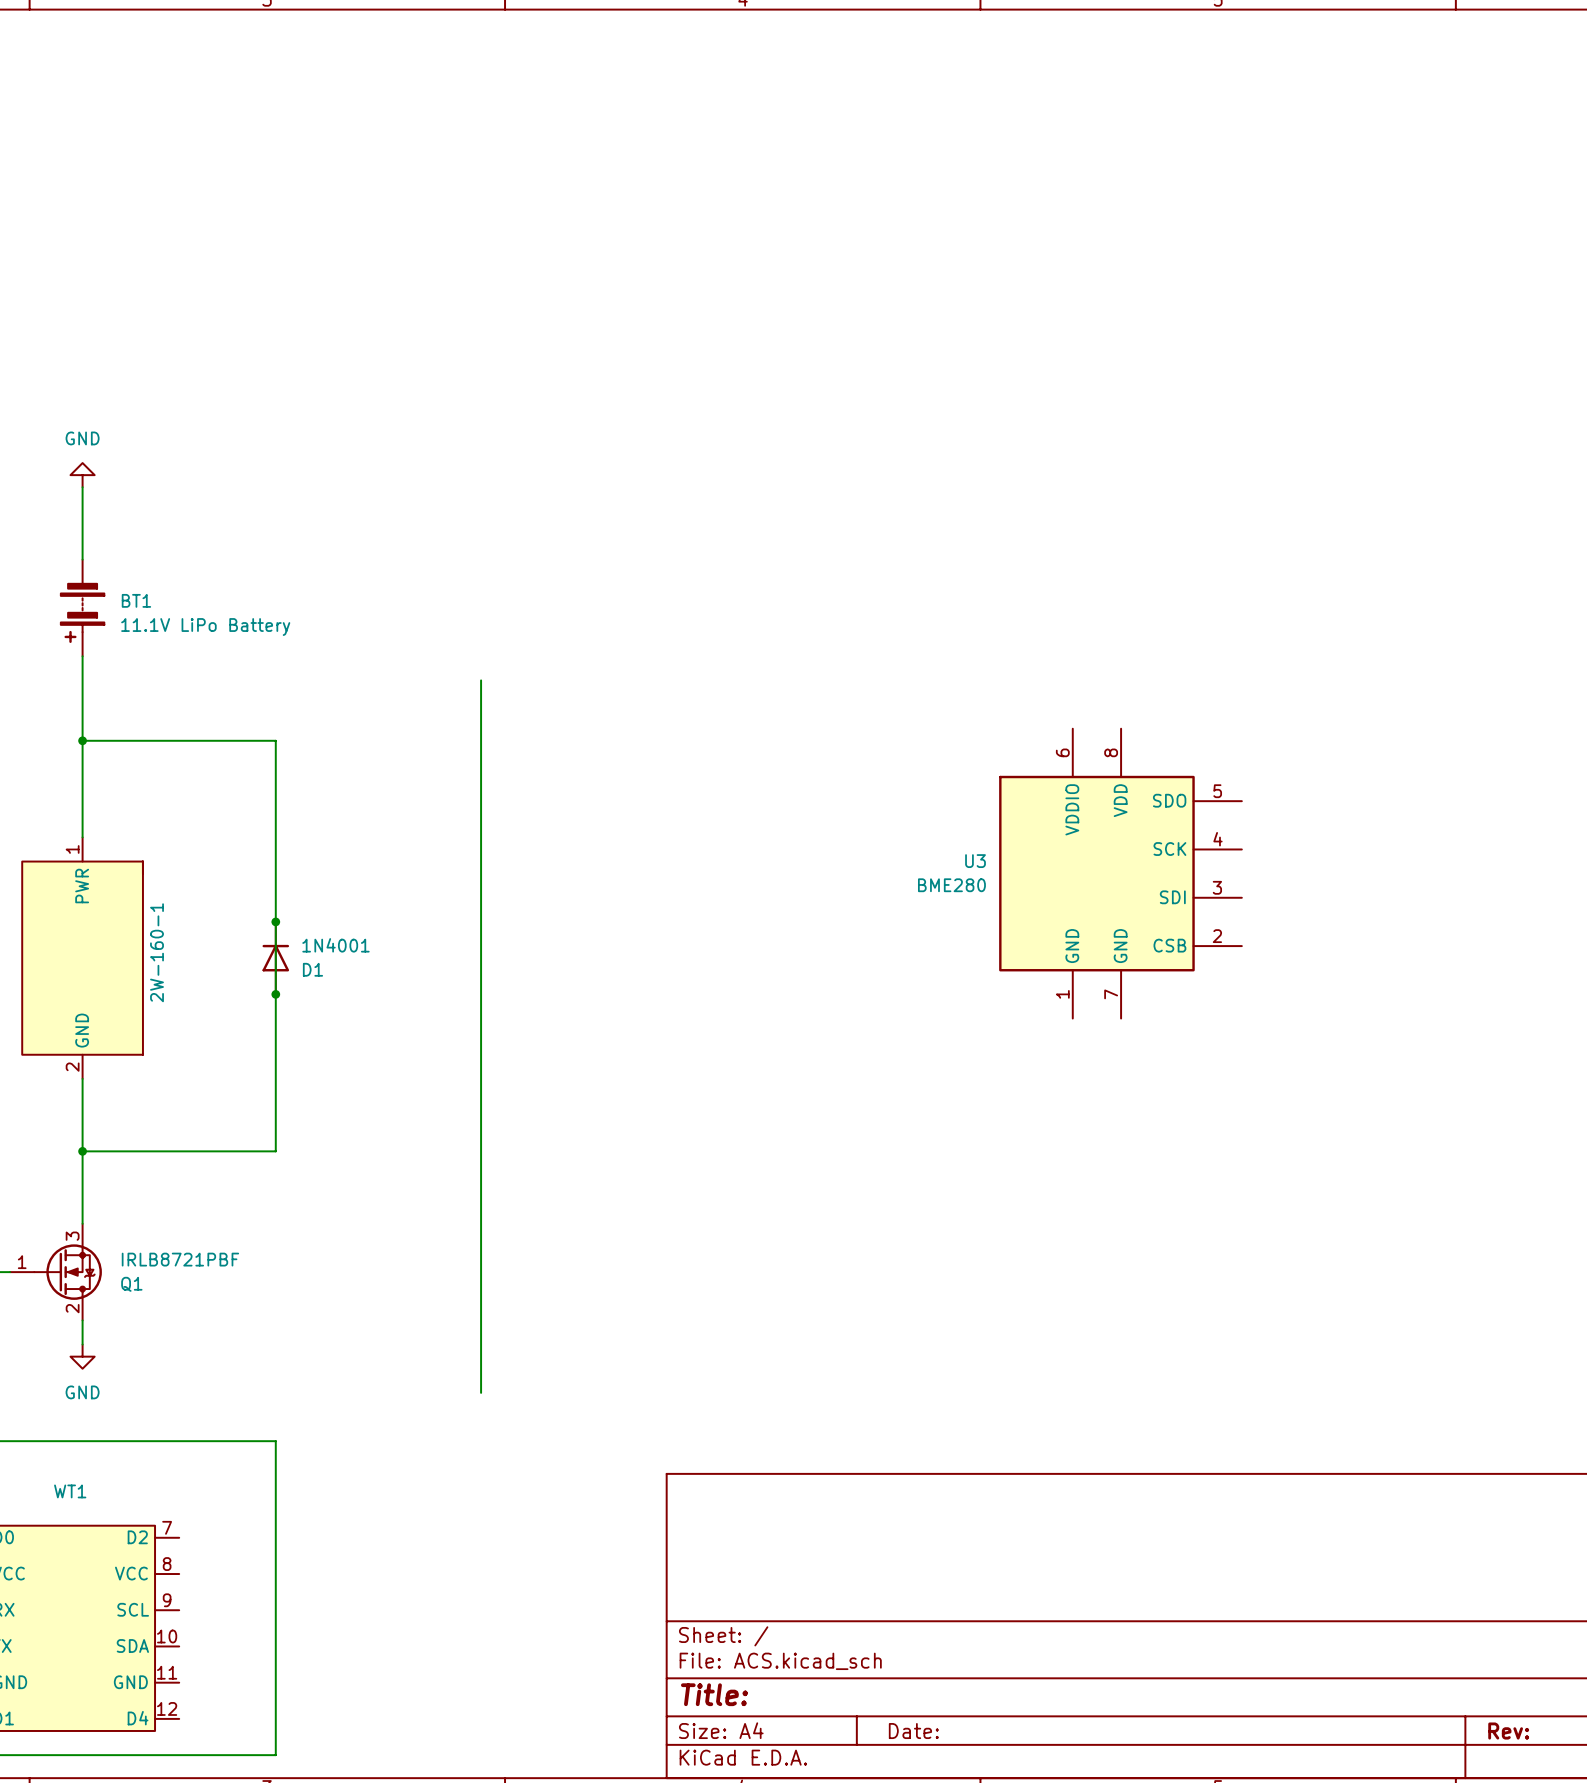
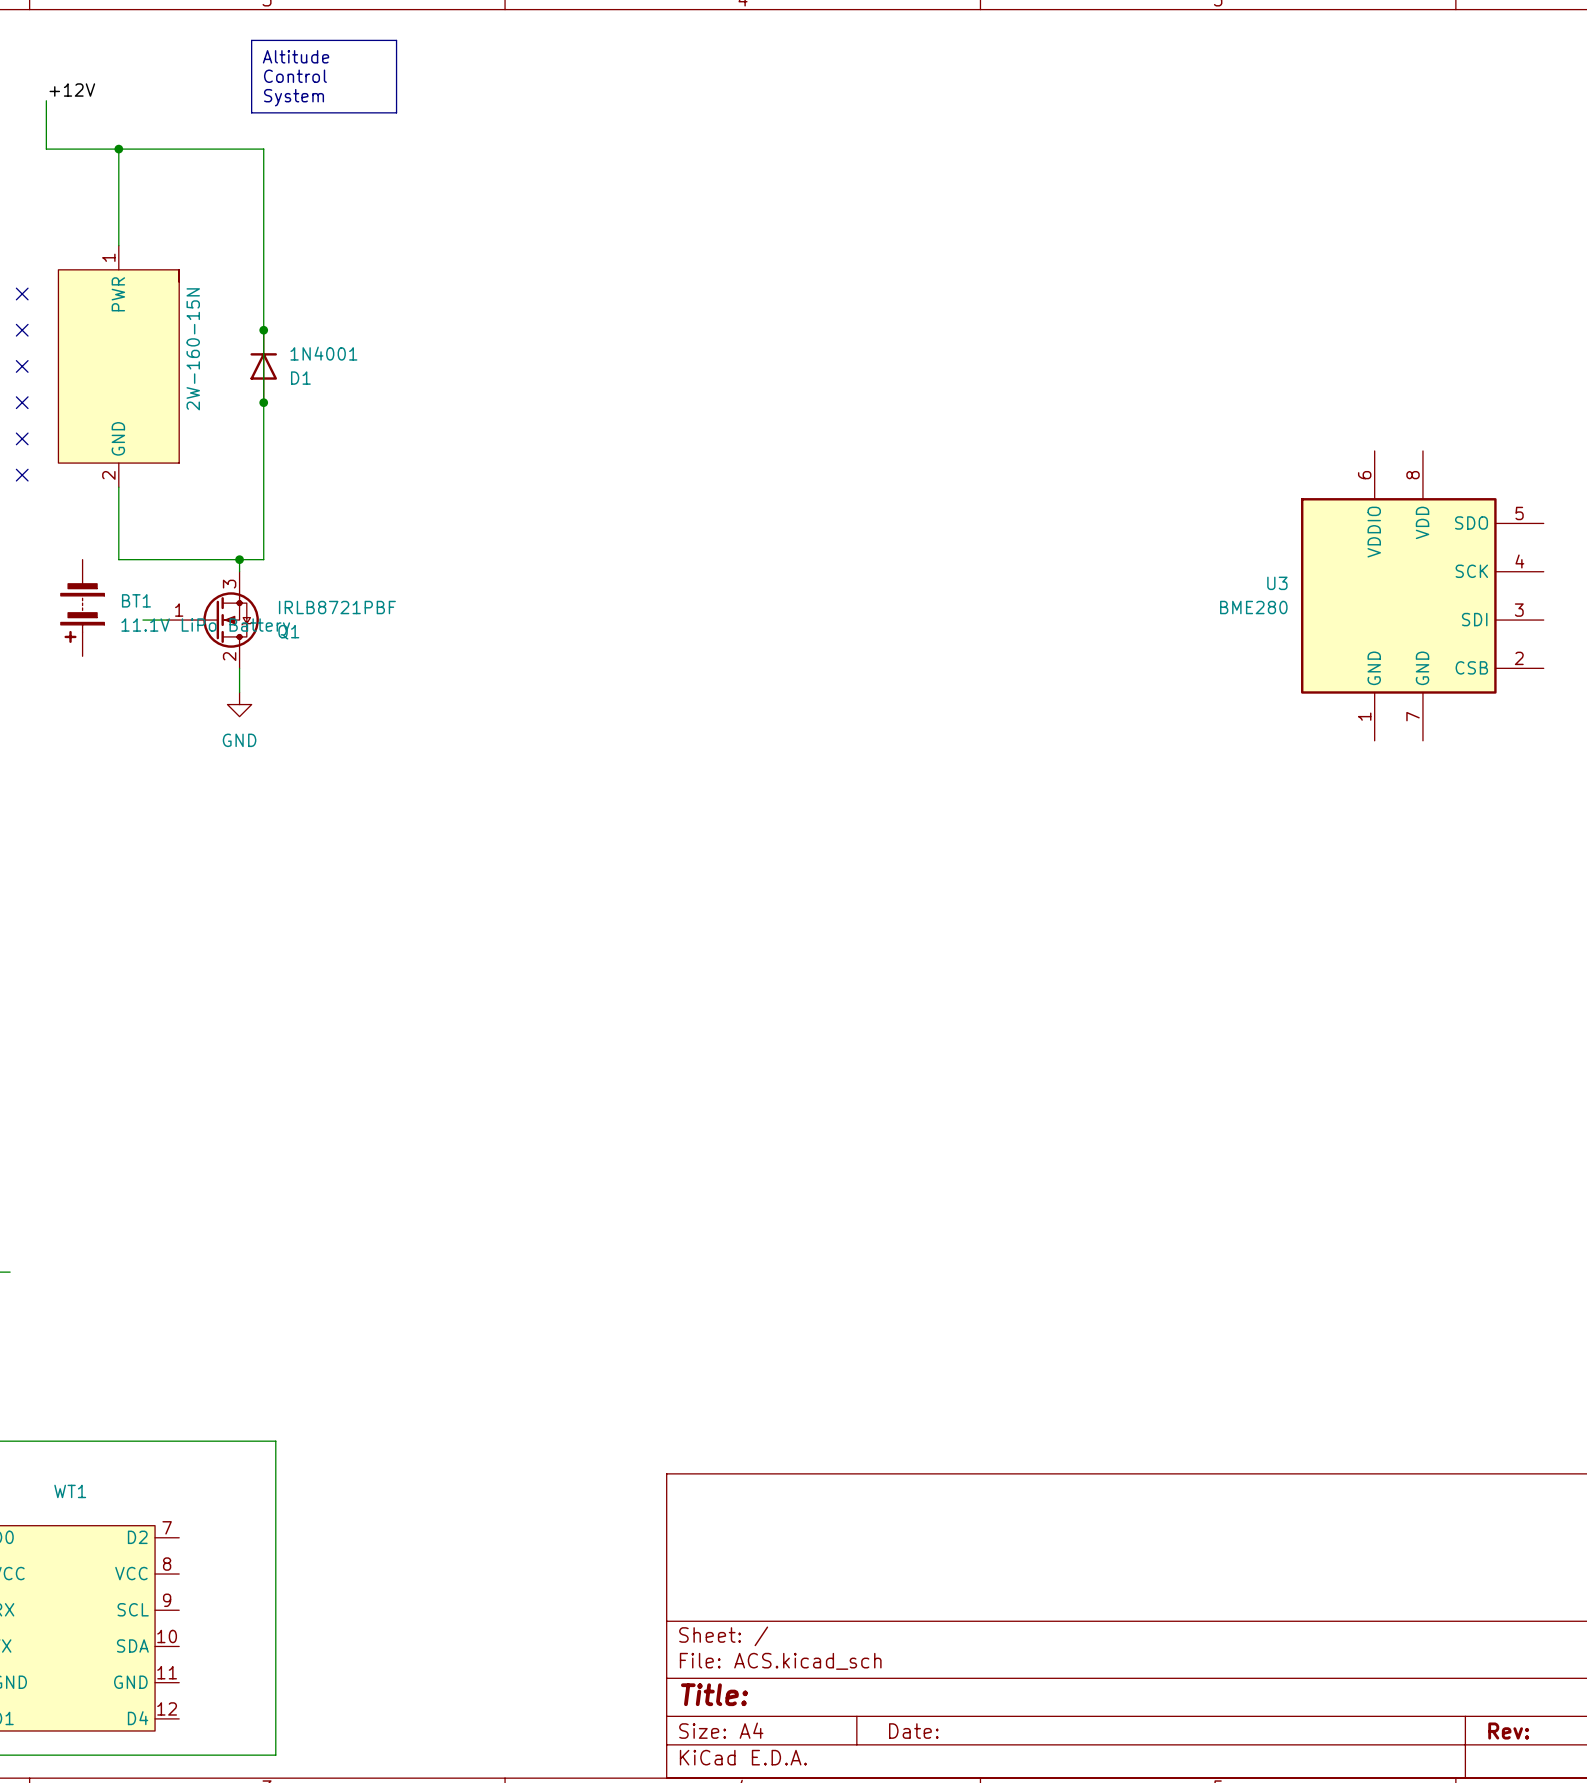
line: none -> (251, 40) (396, 40) (396, 112) (251, 112) (251, 40)
text: none -> Altitude (296, 56)
text: none -> Control (295, 76)
label: none -> +12V (72, 90)
text: none -> System (294, 97)
wire: none -> (46, 100) (46, 149) (263, 149) (263, 559) (118, 559) (118, 487)
wire: none -> (118, 149) (118, 245)
junction: none -> (118, 149)
no-connect mark: none -> (22, 293)
no-connect mark: none -> (22, 330)
junction: none -> (263, 330)
no-connect mark: none -> (22, 366)
2W-160-15N: none -> (118, 366)
no-connect mark: none -> (22, 402)
junction: none -> (263, 402)
no-connect mark: none -> (22, 438)
no-connect mark: none -> (22, 475)
power symbol: GND (82, 475) -> none
wire: (82, 487) (82, 559) -> none
wire: none -> (239, 559) (239, 571)
junction: none -> (239, 559)
wire: none -> (142, 620) (167, 620)
wire: (82, 656) (82, 837) -> none
wire: none -> (239, 668) (239, 692)
wire: (481, 680) (481, 1392) -> none
power symbol: none -> GND (239, 704)
wire: (82, 740) (275, 740) (275, 1151) (82, 1151) -> none
junction: (82, 740) -> none
U3 position: (1120, 873) -> (1422, 595)
junction: (275, 921) -> none
2W-160-1: (82, 958) -> none
D1 position: (275, 958) -> (263, 366)
junction: (275, 994) -> none
wire: (82, 1078) (82, 1223) -> none
junction: (82, 1151) -> none
Q1 position: (56, 1272) -> (213, 620)
wire: (82, 1320) (82, 1344) -> none
power symbol: GND (82, 1356) -> none

